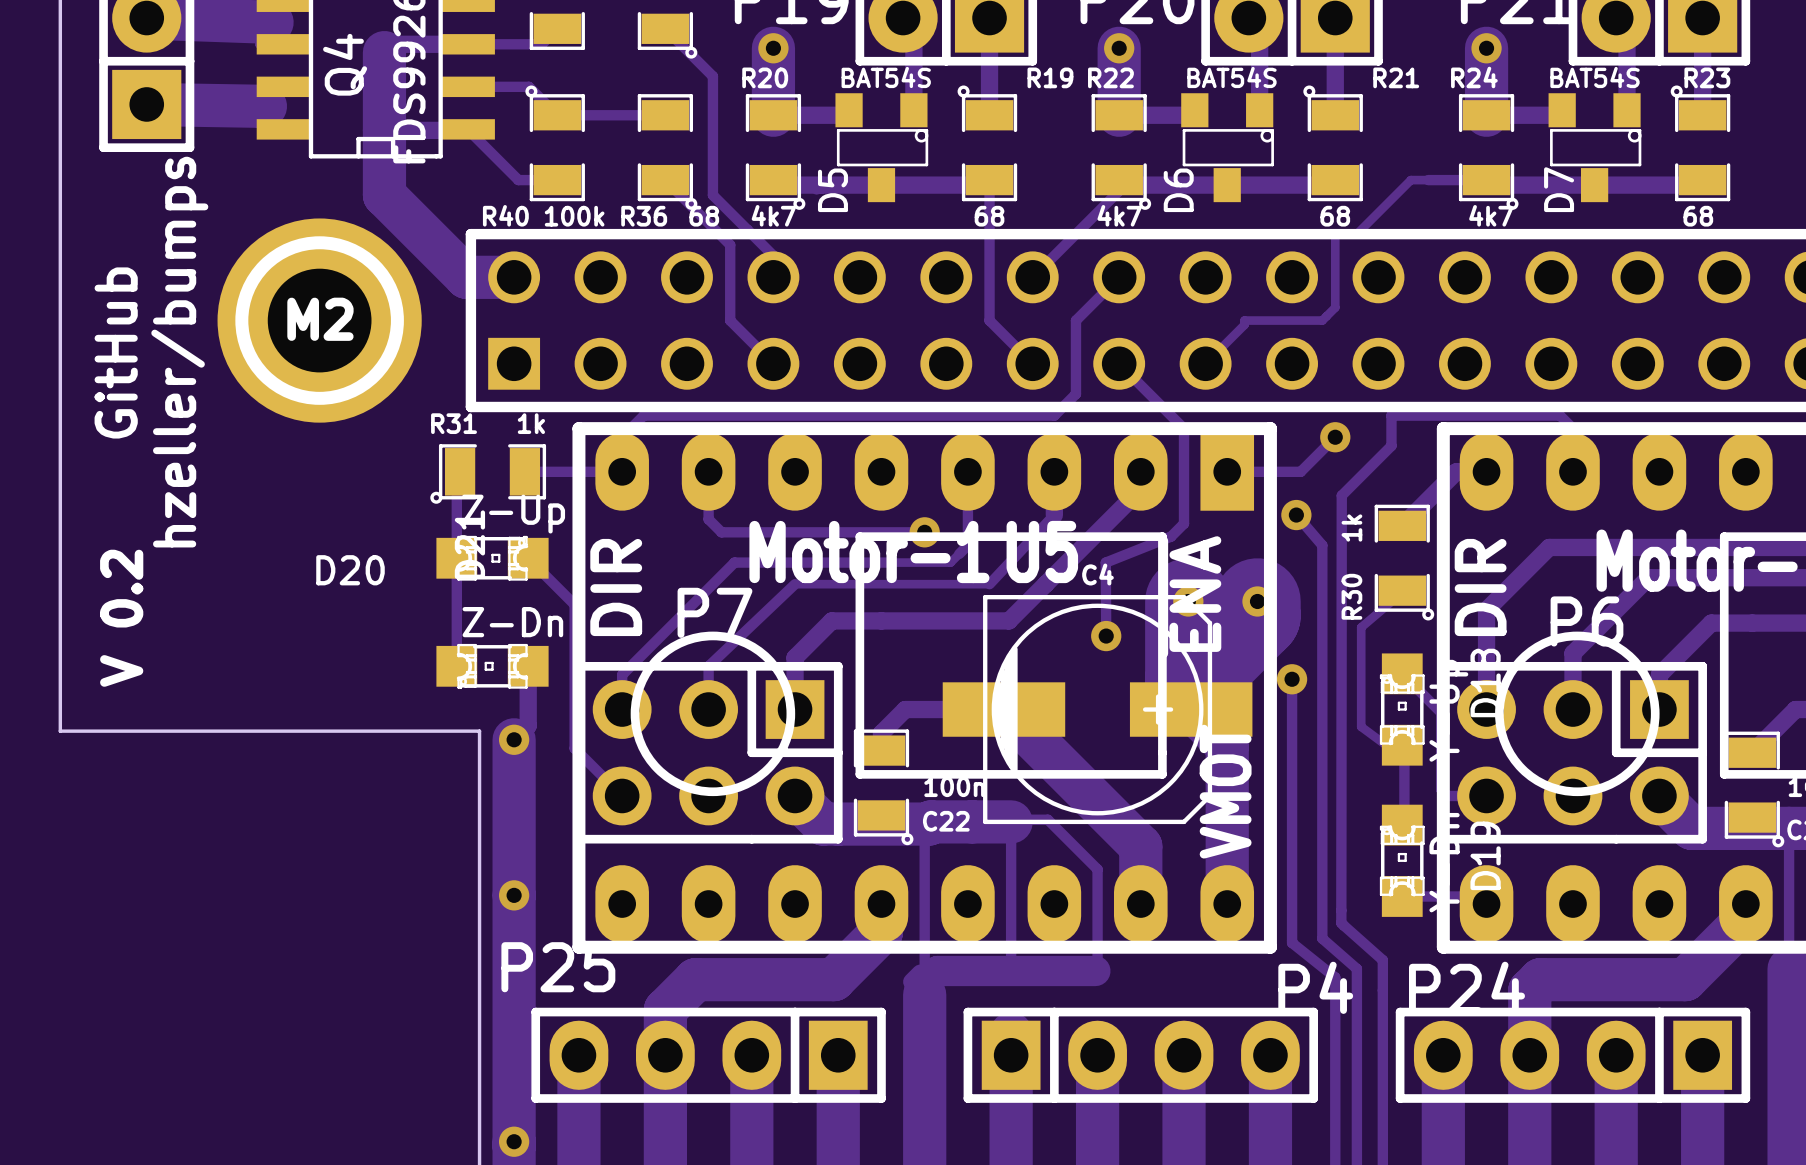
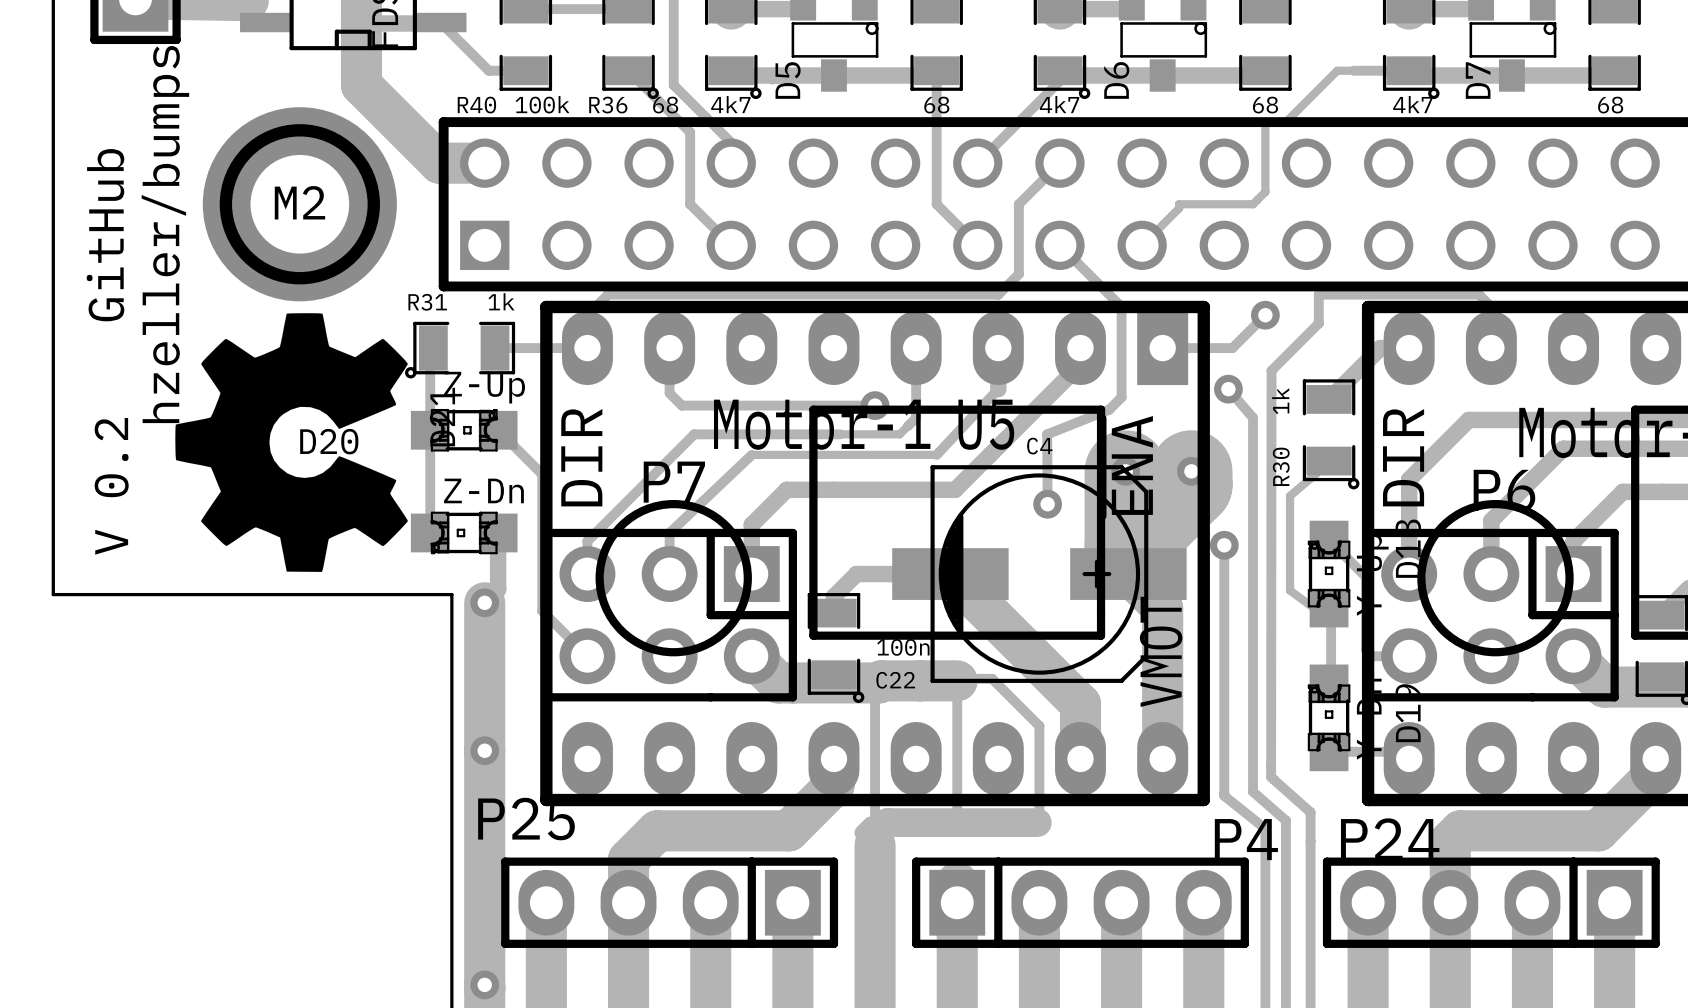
drawing: none -> [175, 313, 408, 572]

